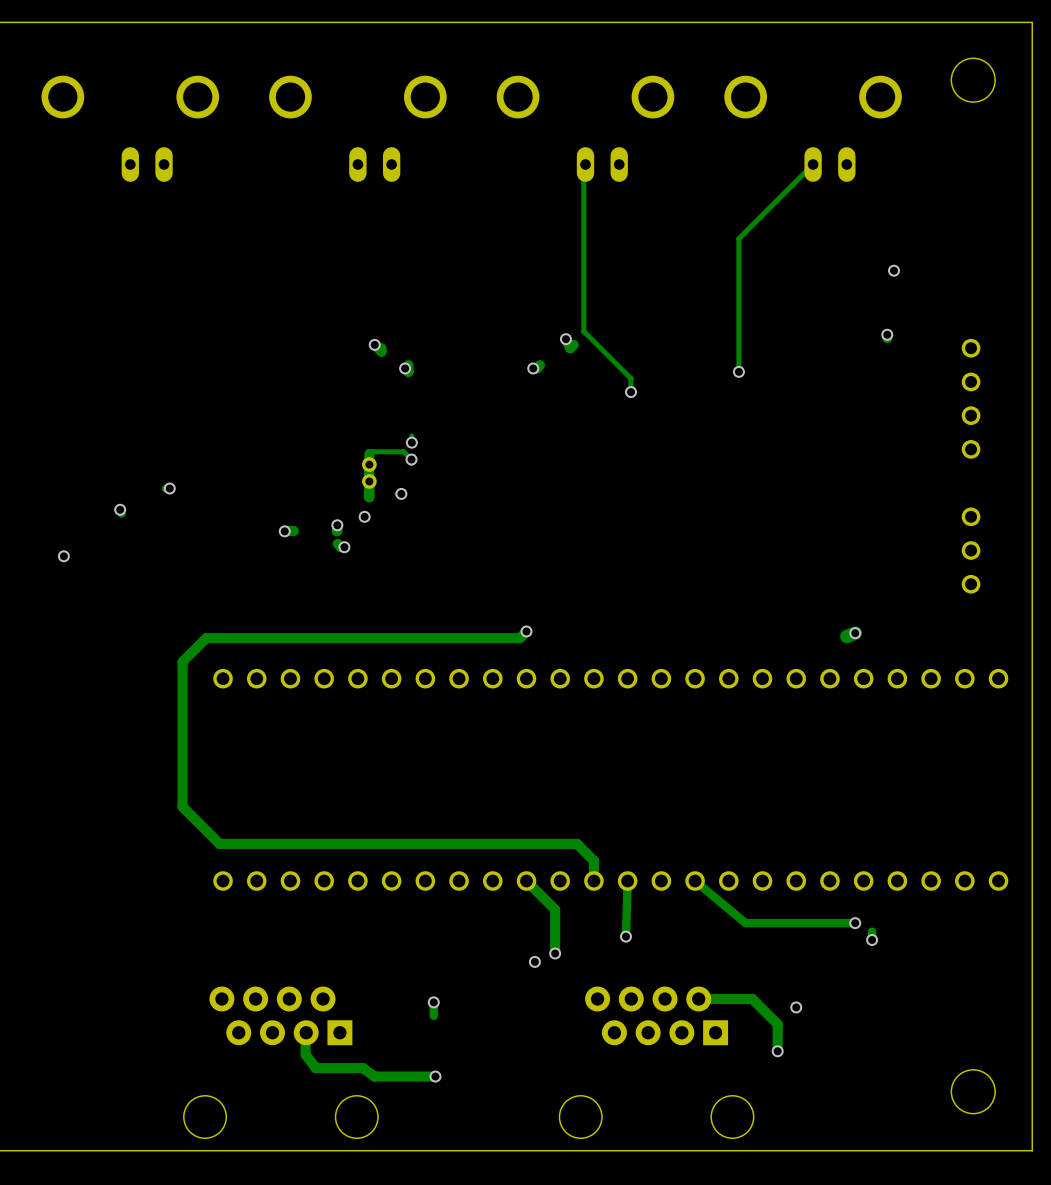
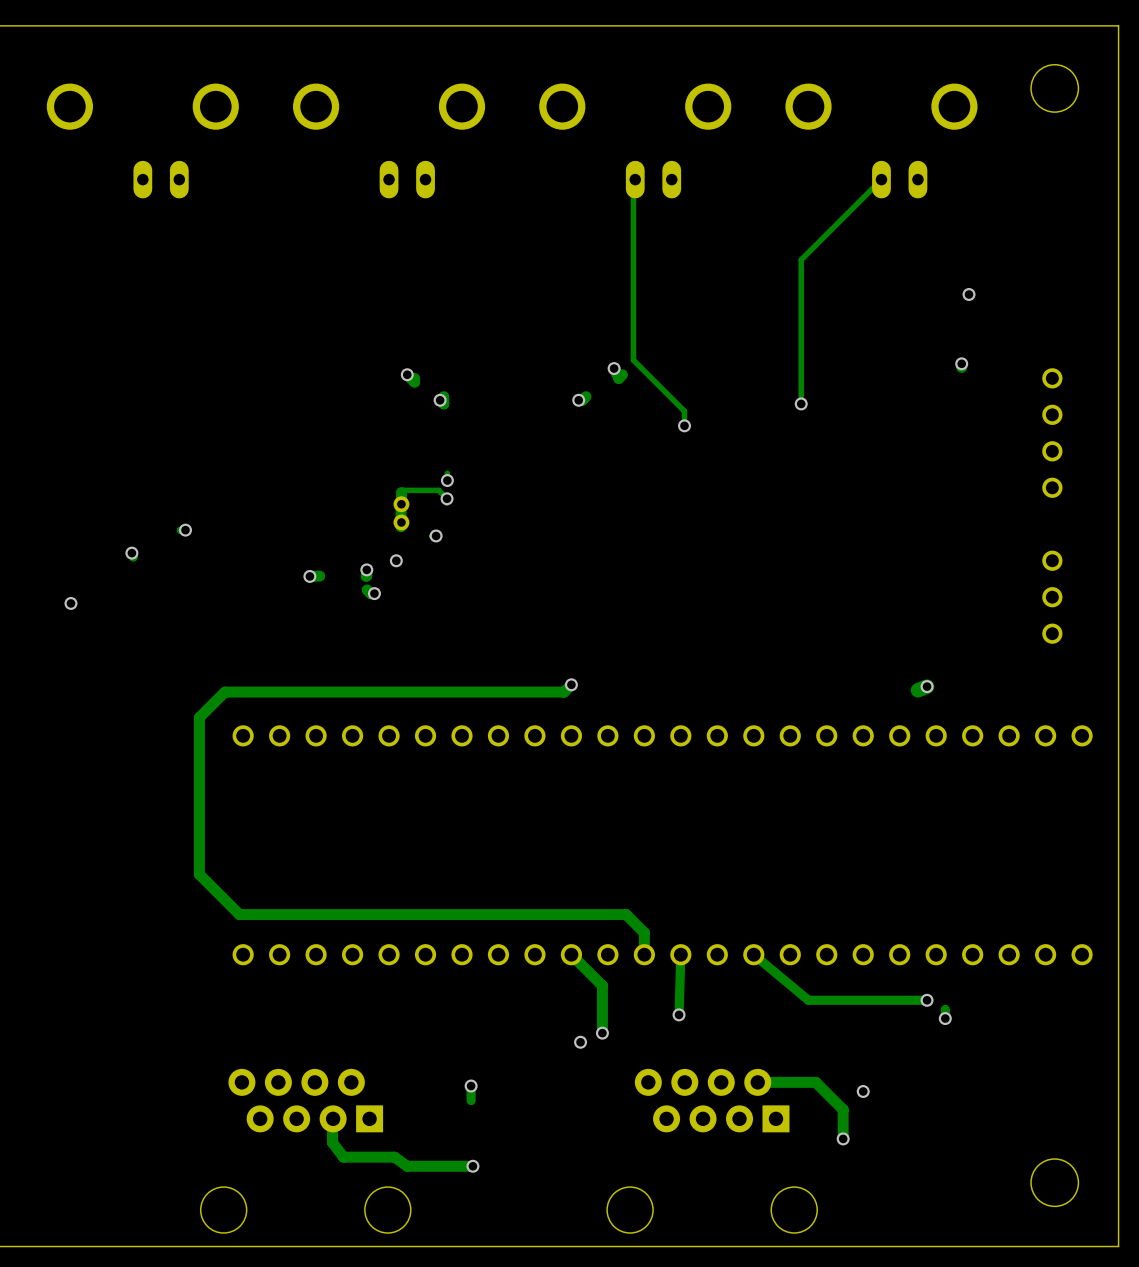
track: (369, 481) (369, 497) (369, 485) -> none

